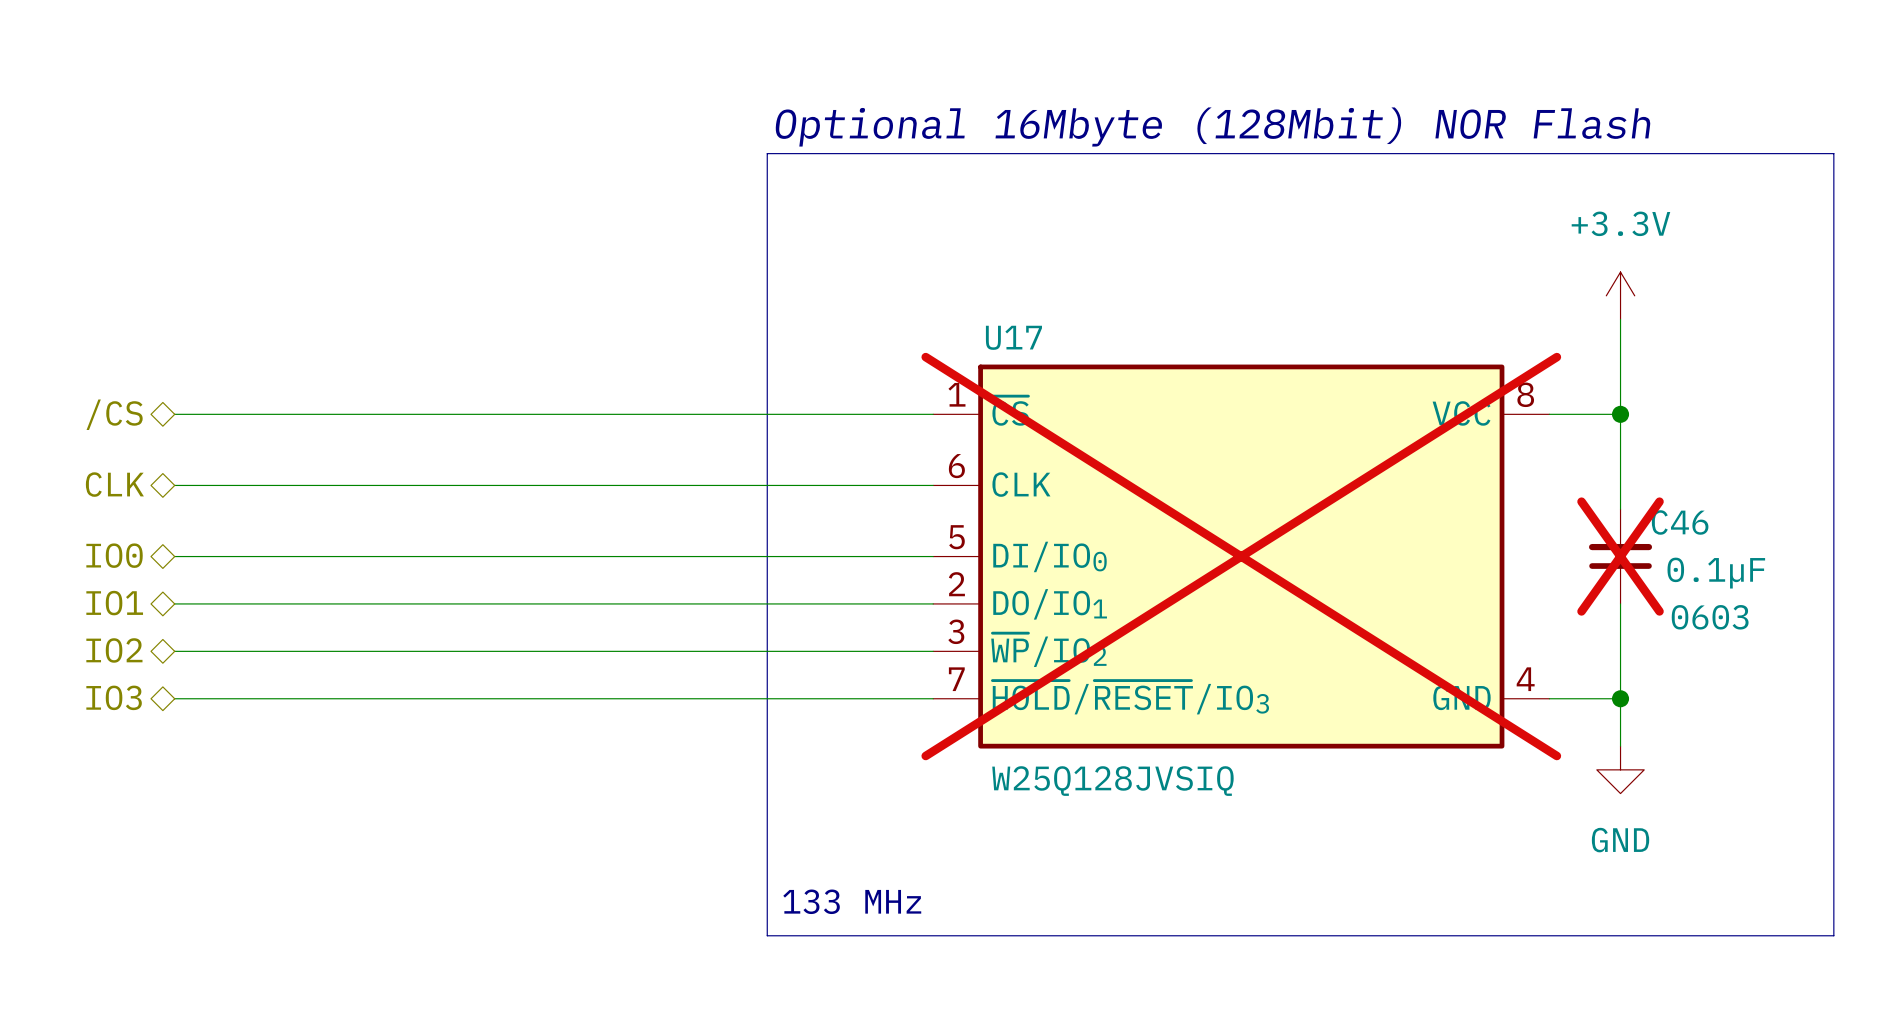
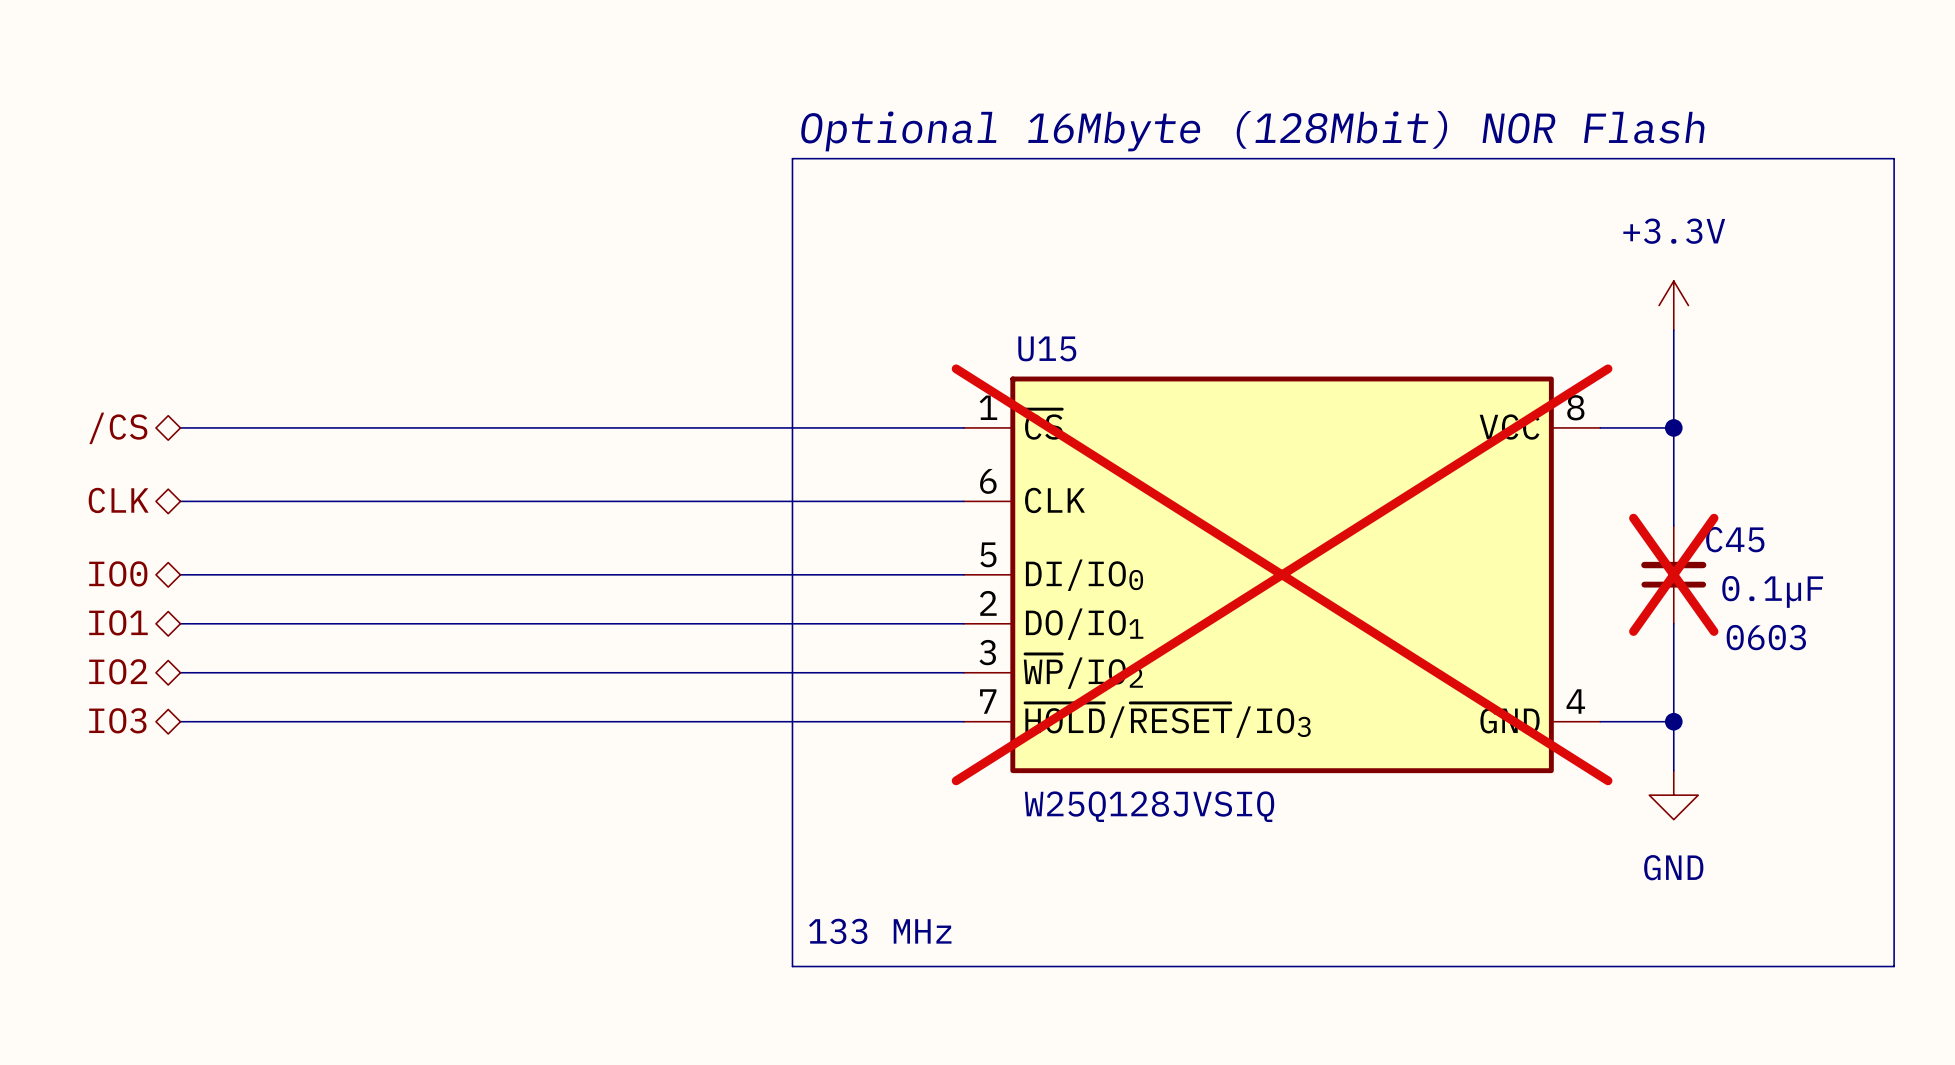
U17 name: U17 (1013, 337) -> U15 (1047, 348)
C46 name: C46 (1680, 522) -> C45 (1735, 539)

